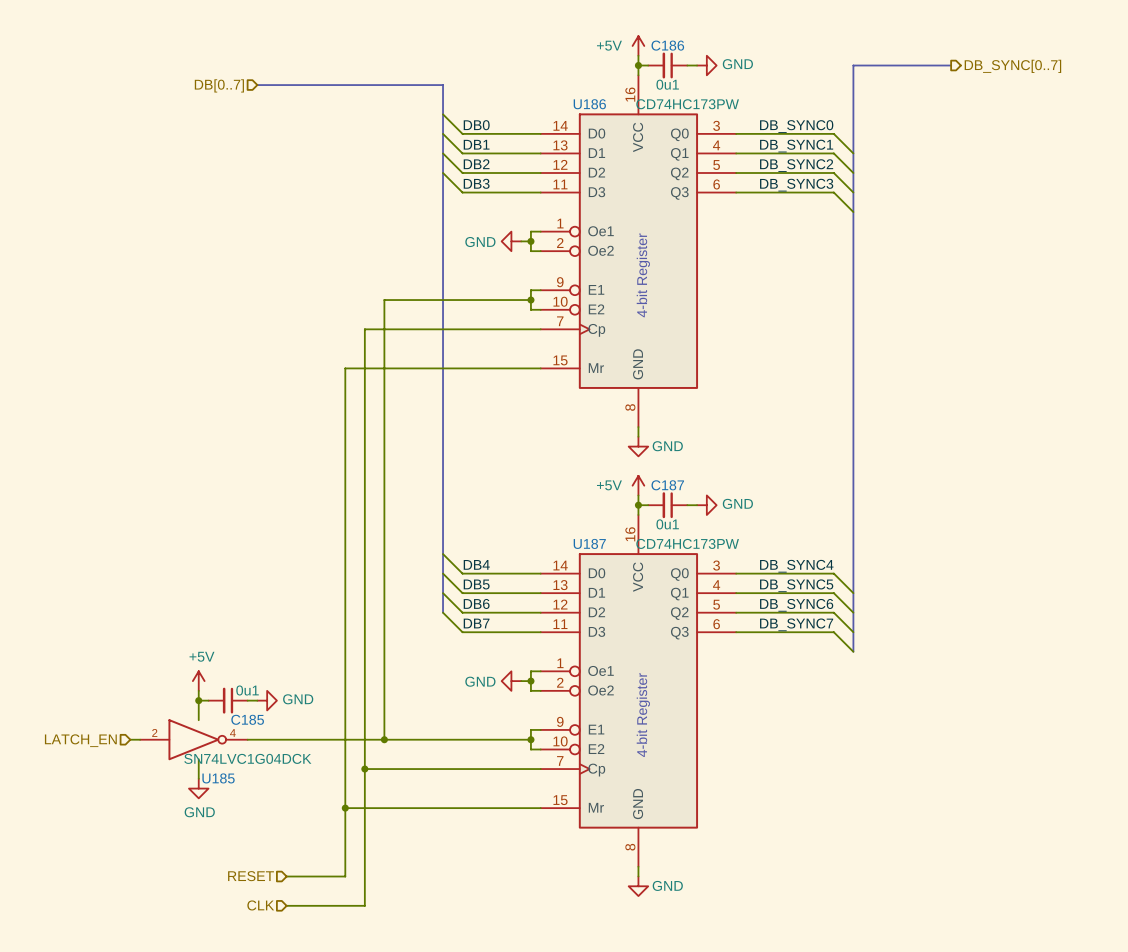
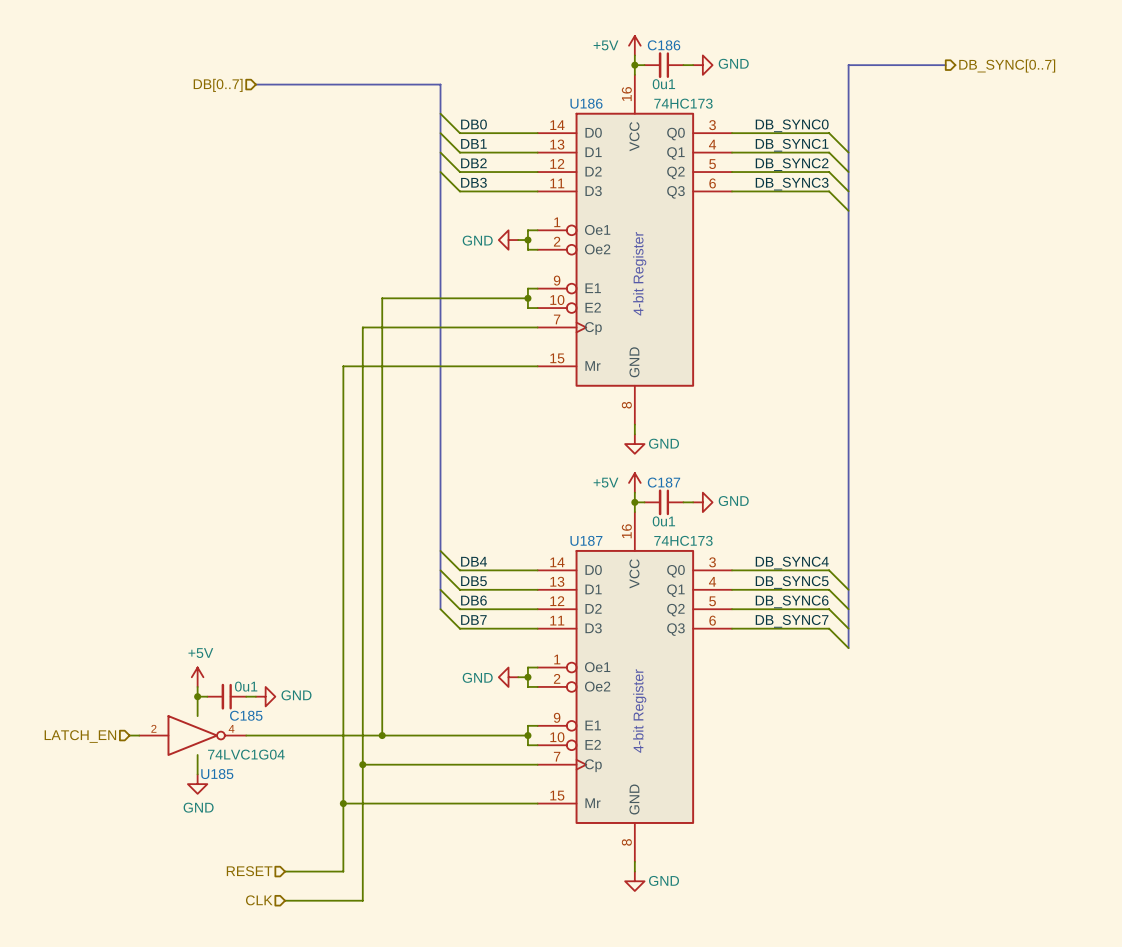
U186 value: CD74HC173PW (687, 104) -> 74HC173 (683, 103)
U187 value: CD74HC173PW (687, 543) -> 74HC173 (683, 540)
U185 value: SN74LVC1G04DCK (247, 758) -> 74LVC1G04 (246, 754)

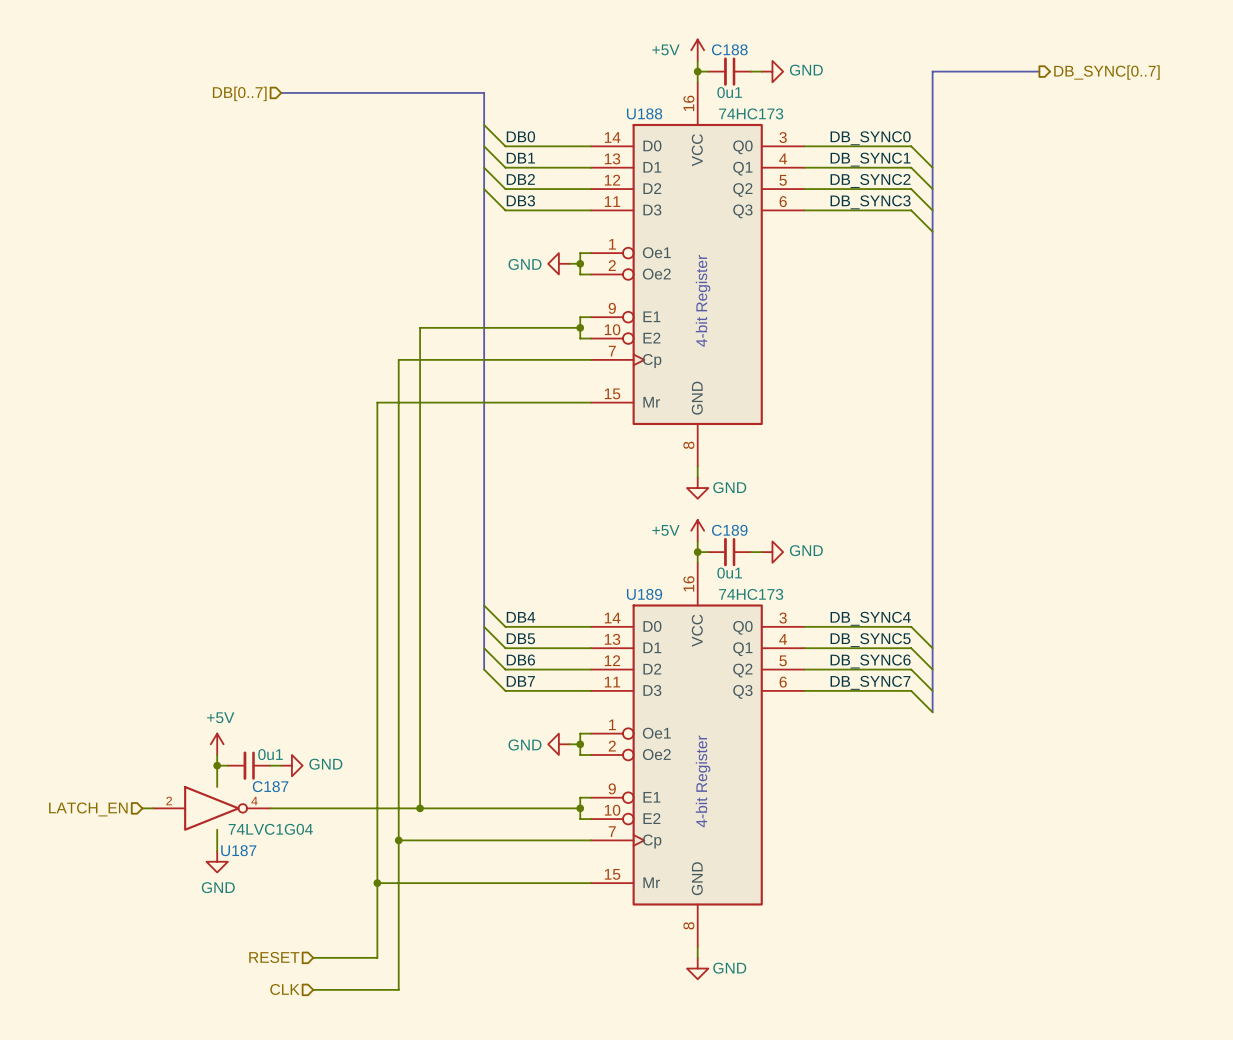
C186 name: C186 (664, 45) -> C188 (729, 49)
U186 name: U186 (586, 103) -> U188 (644, 113)
C187 name: C187 (663, 482) -> C189 (729, 530)
U187 name: U187 (586, 540) -> U189 (644, 594)
C185 name: C185 (246, 715) -> C187 (270, 786)
U185 name: U185 (217, 774) -> U187 (238, 850)

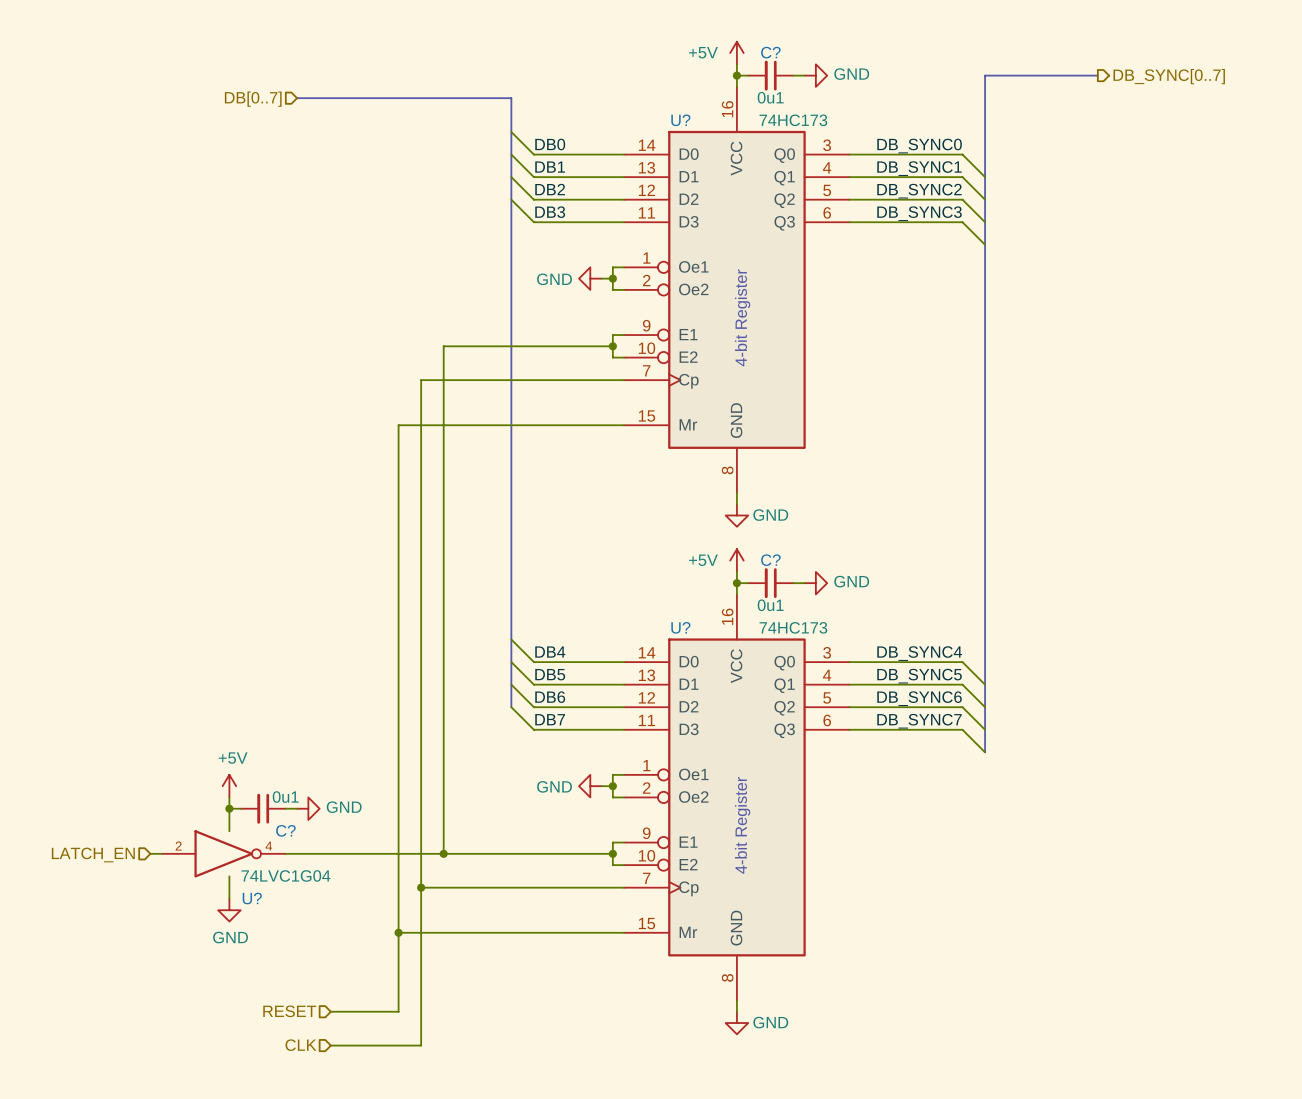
C188 name: C188 (729, 49) -> C? (770, 52)
U188 name: U188 (644, 113) -> U? (680, 120)
C189 name: C189 (729, 530) -> C? (770, 560)
U189 name: U189 (644, 594) -> U? (680, 627)
C187 name: C187 (270, 786) -> C? (285, 830)
U187 name: U187 (238, 850) -> U? (252, 898)

